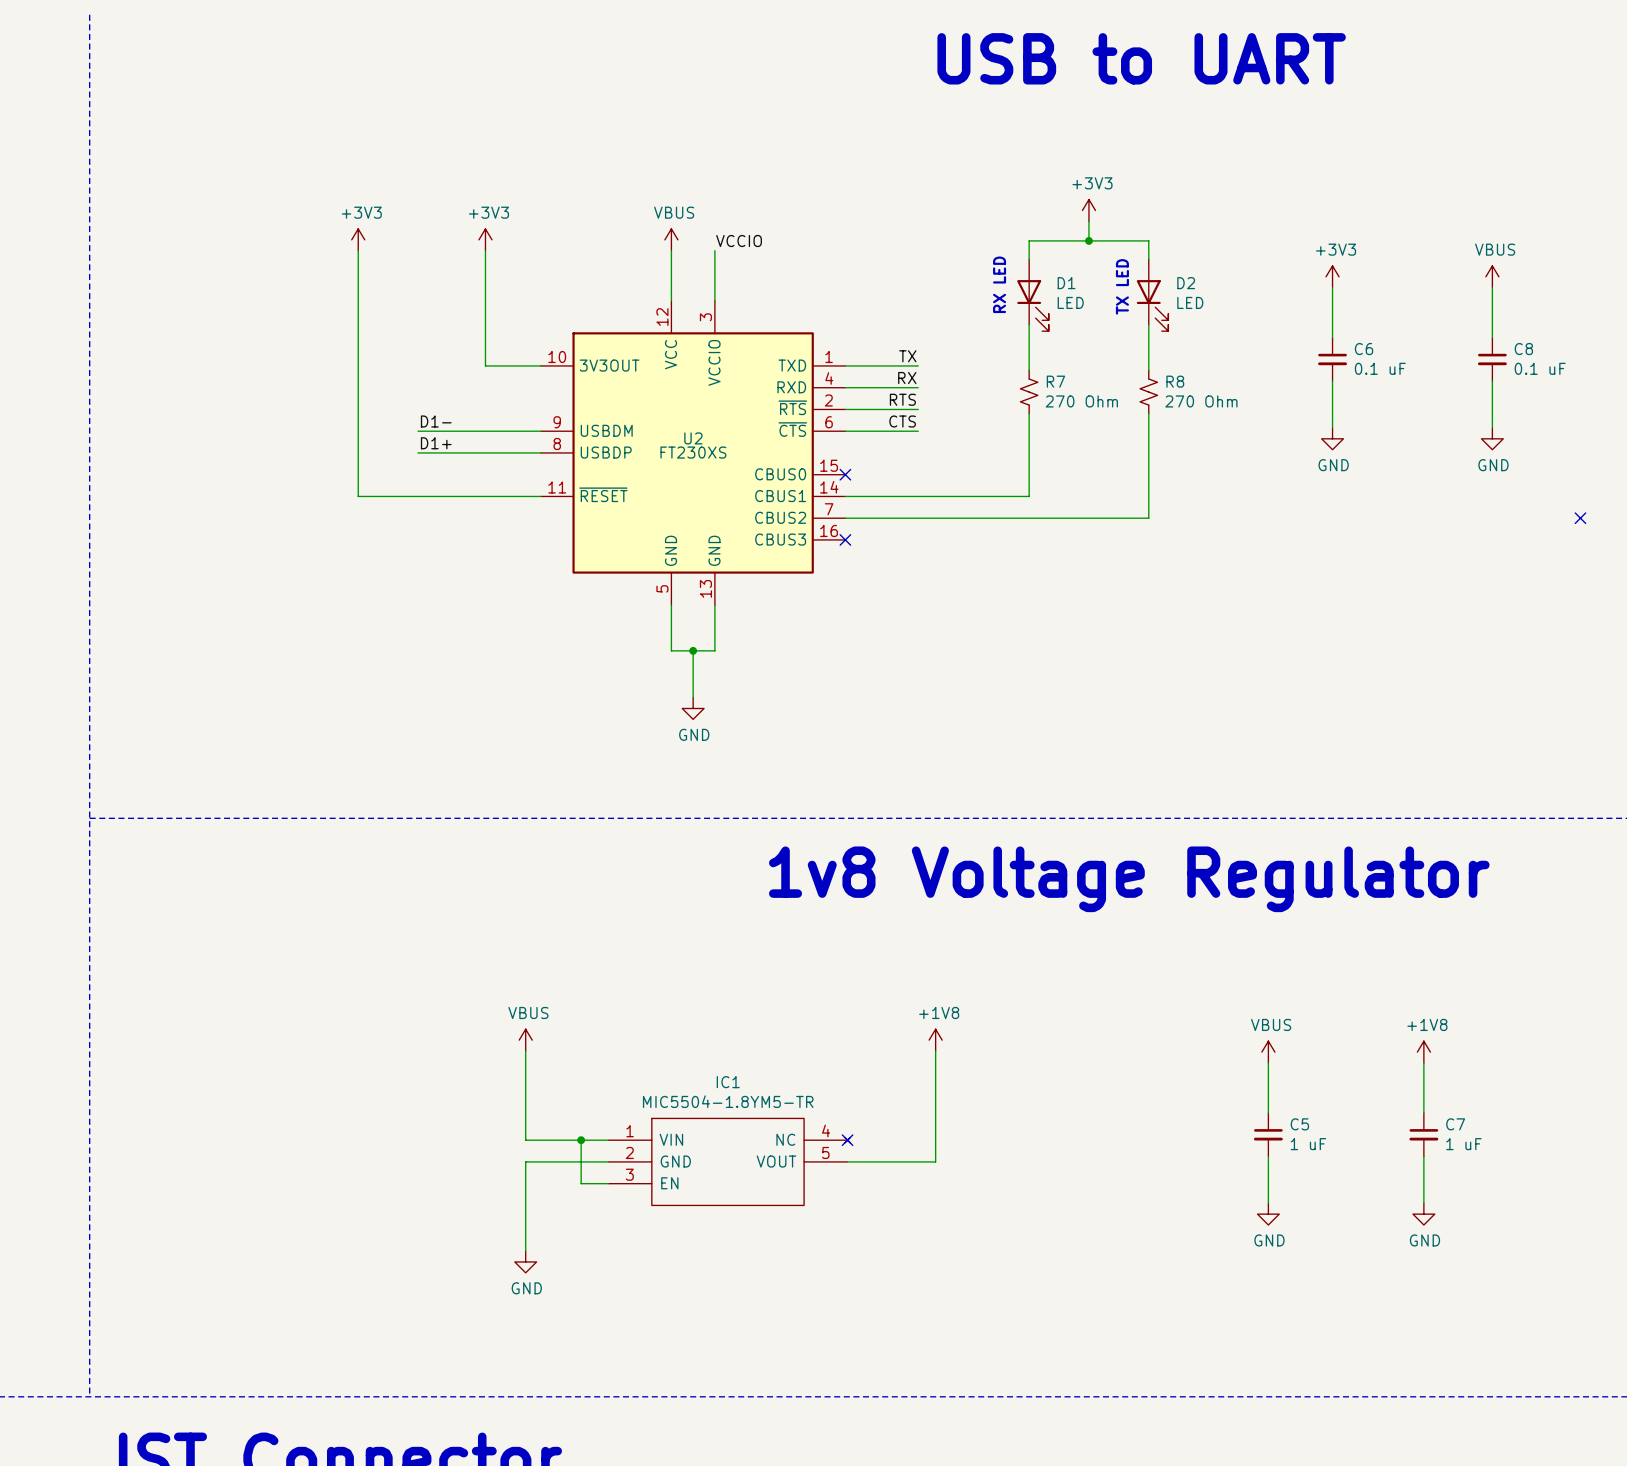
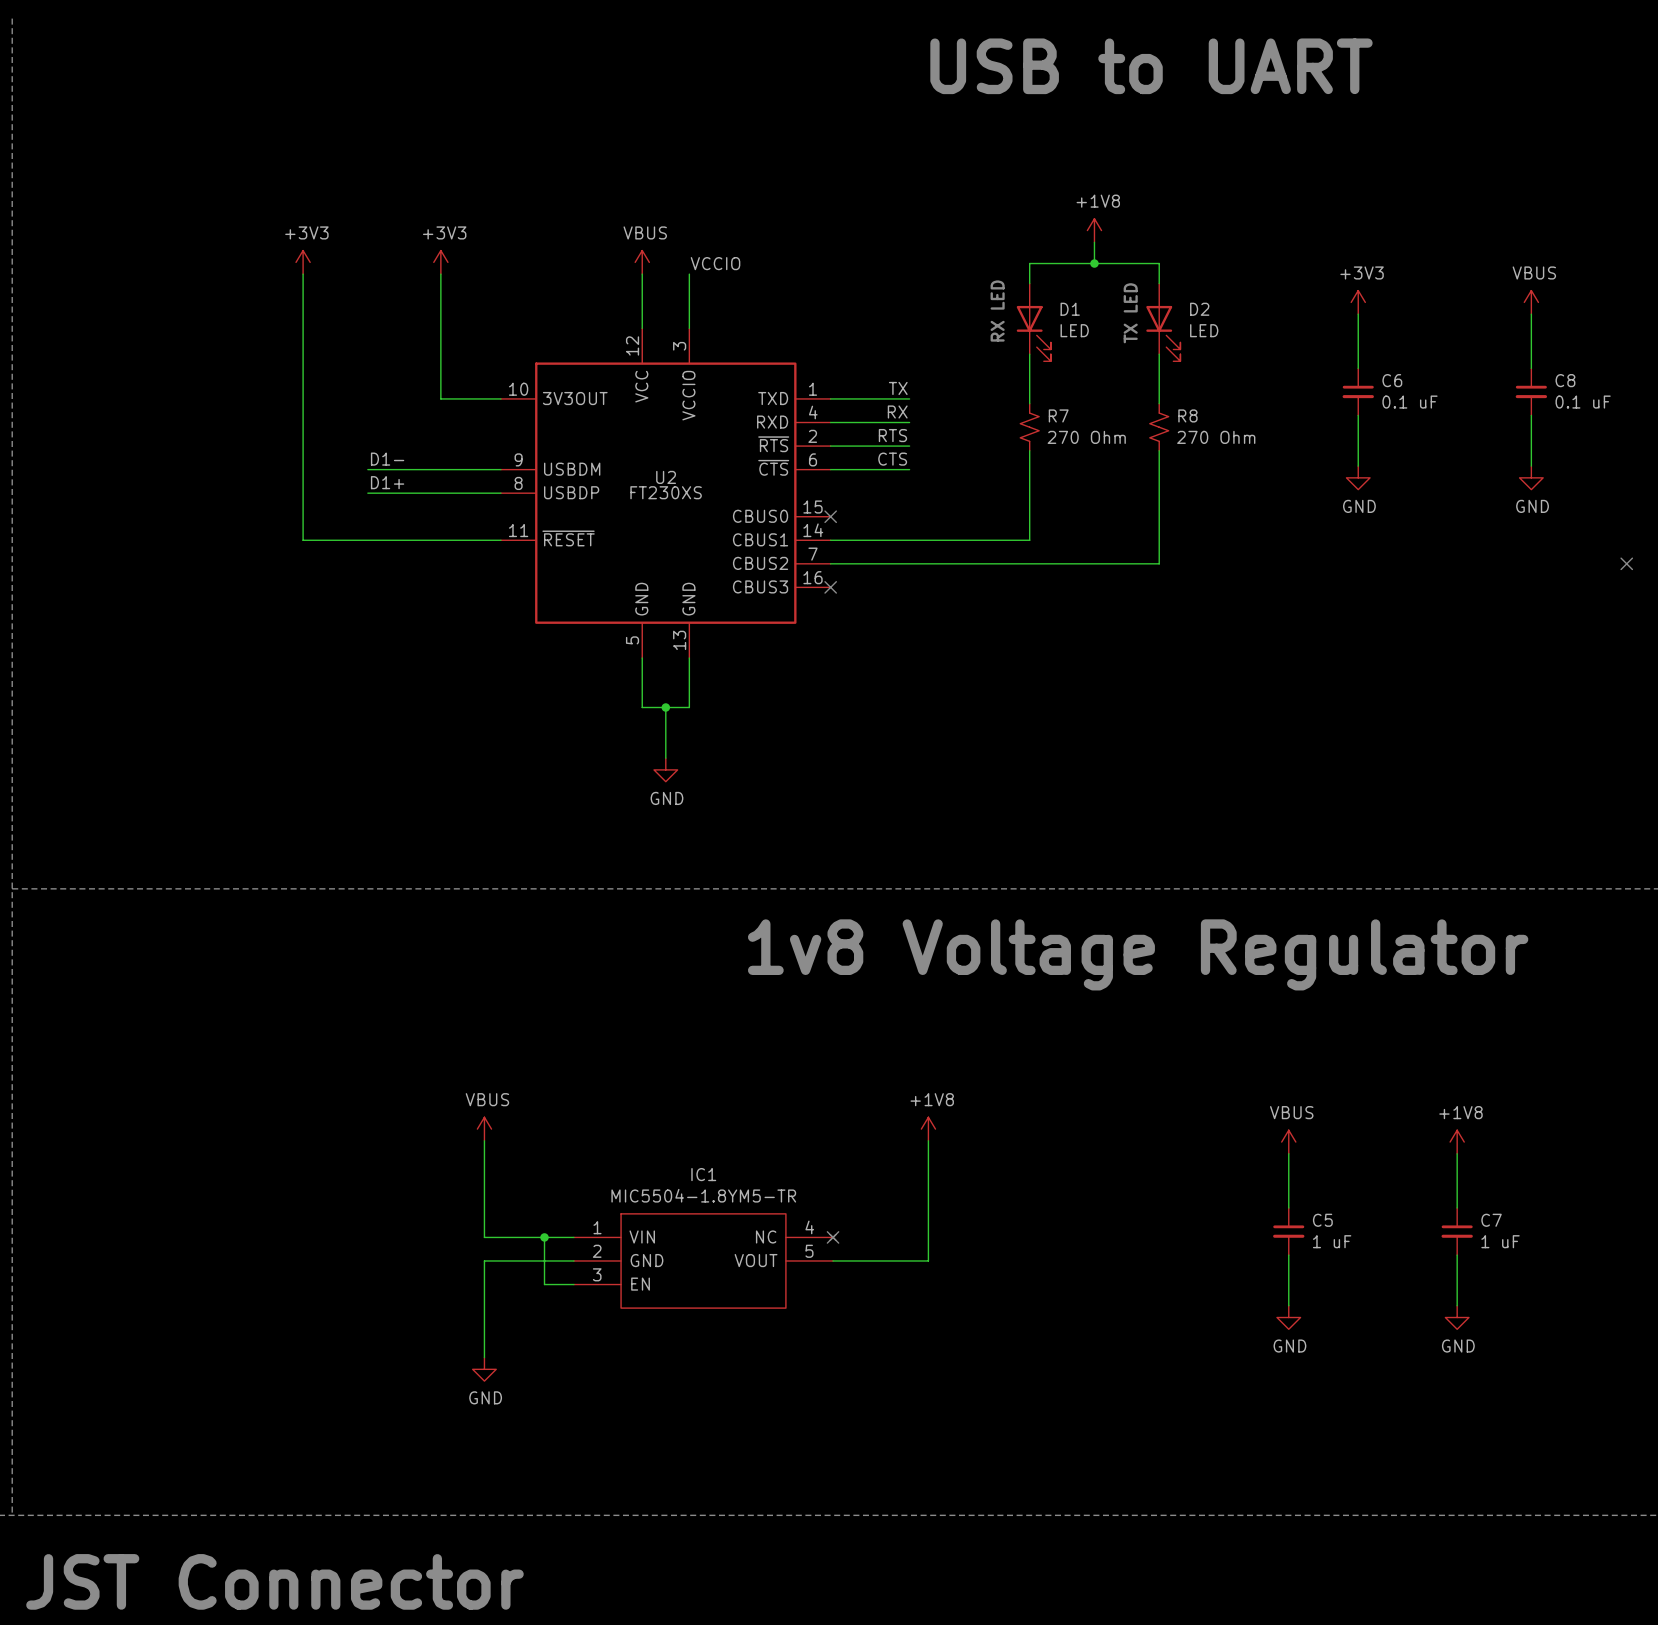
power symbol: +3V3 (1088, 210) -> +1V8 (1094, 230)

